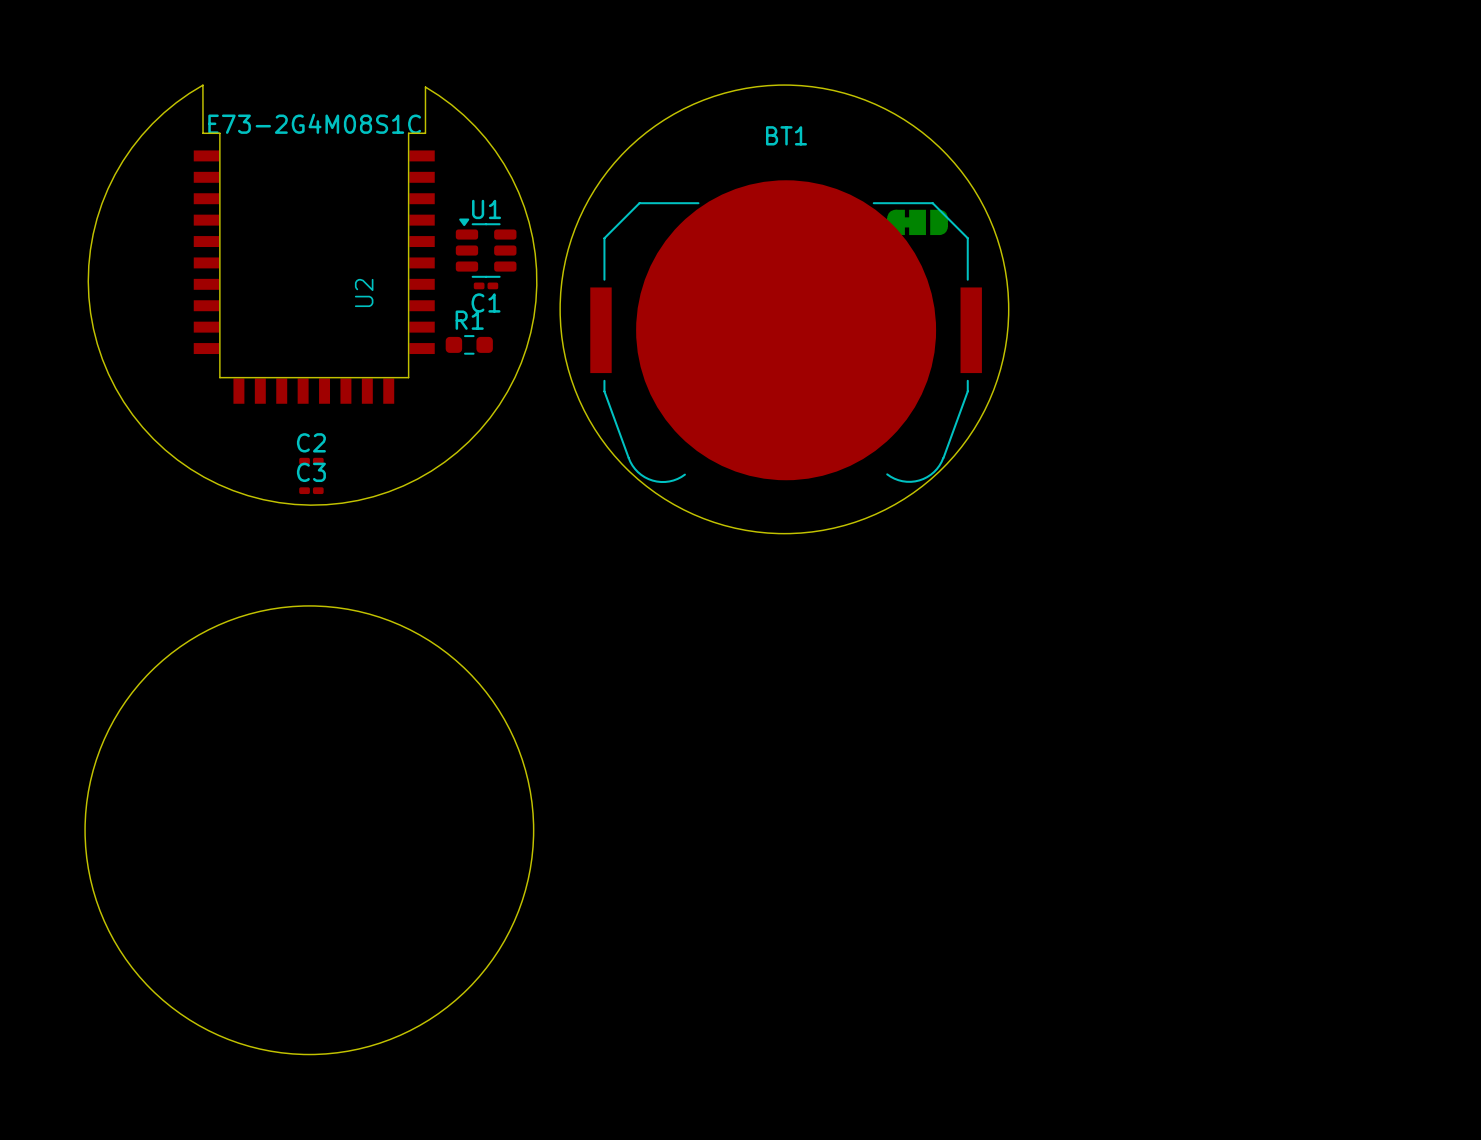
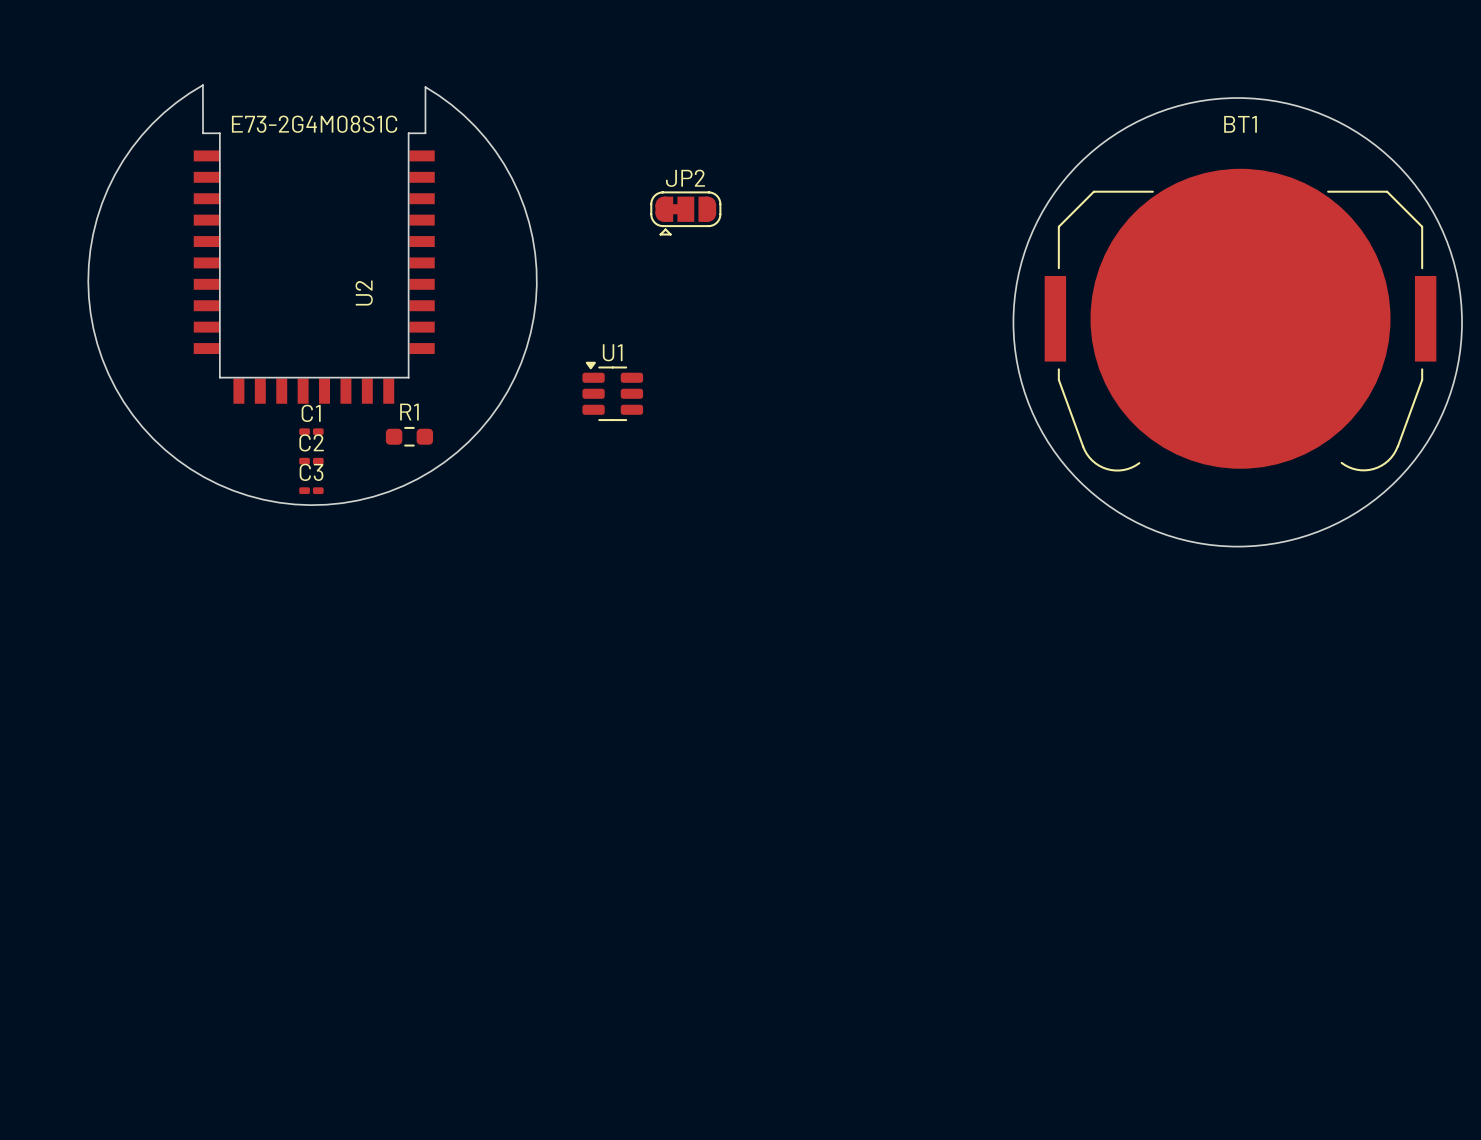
round board edge: [559, 84, 1010, 535] -> none
round board edge: none -> [1013, 97, 1463, 548]
JP2 side: bottom (917, 222) -> top (685, 213)
U1 position: (486, 248) -> (612, 391)
C1 position: (486, 285) -> (311, 431)
C1 name position: C1 (486, 302) -> C1 (311, 413)
BT1 position: (786, 331) -> (1240, 320)
R1 position: (469, 344) -> (409, 436)
round board edge: [84, 605, 535, 1055] -> none

